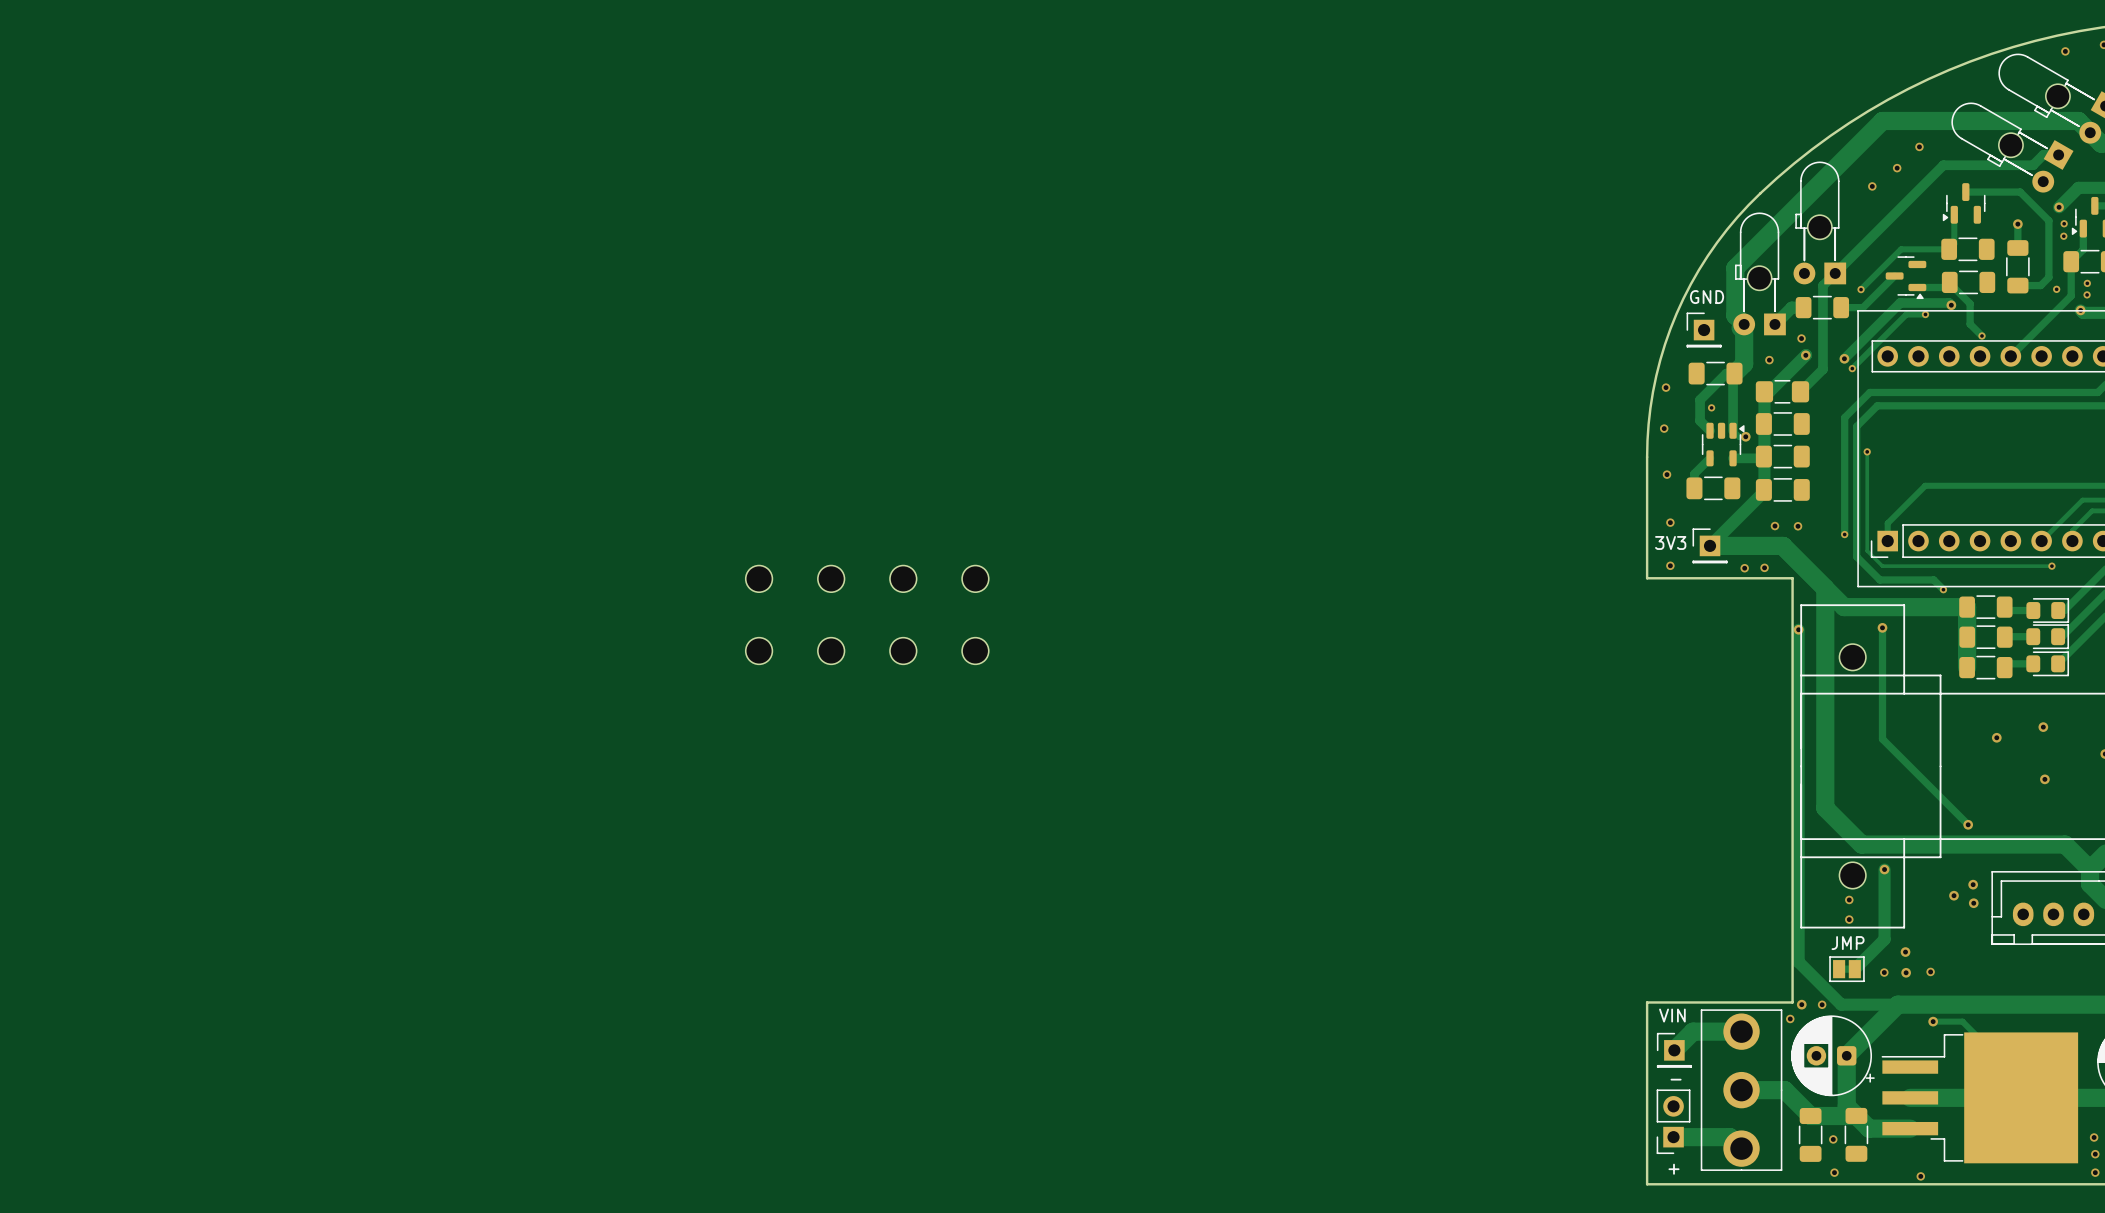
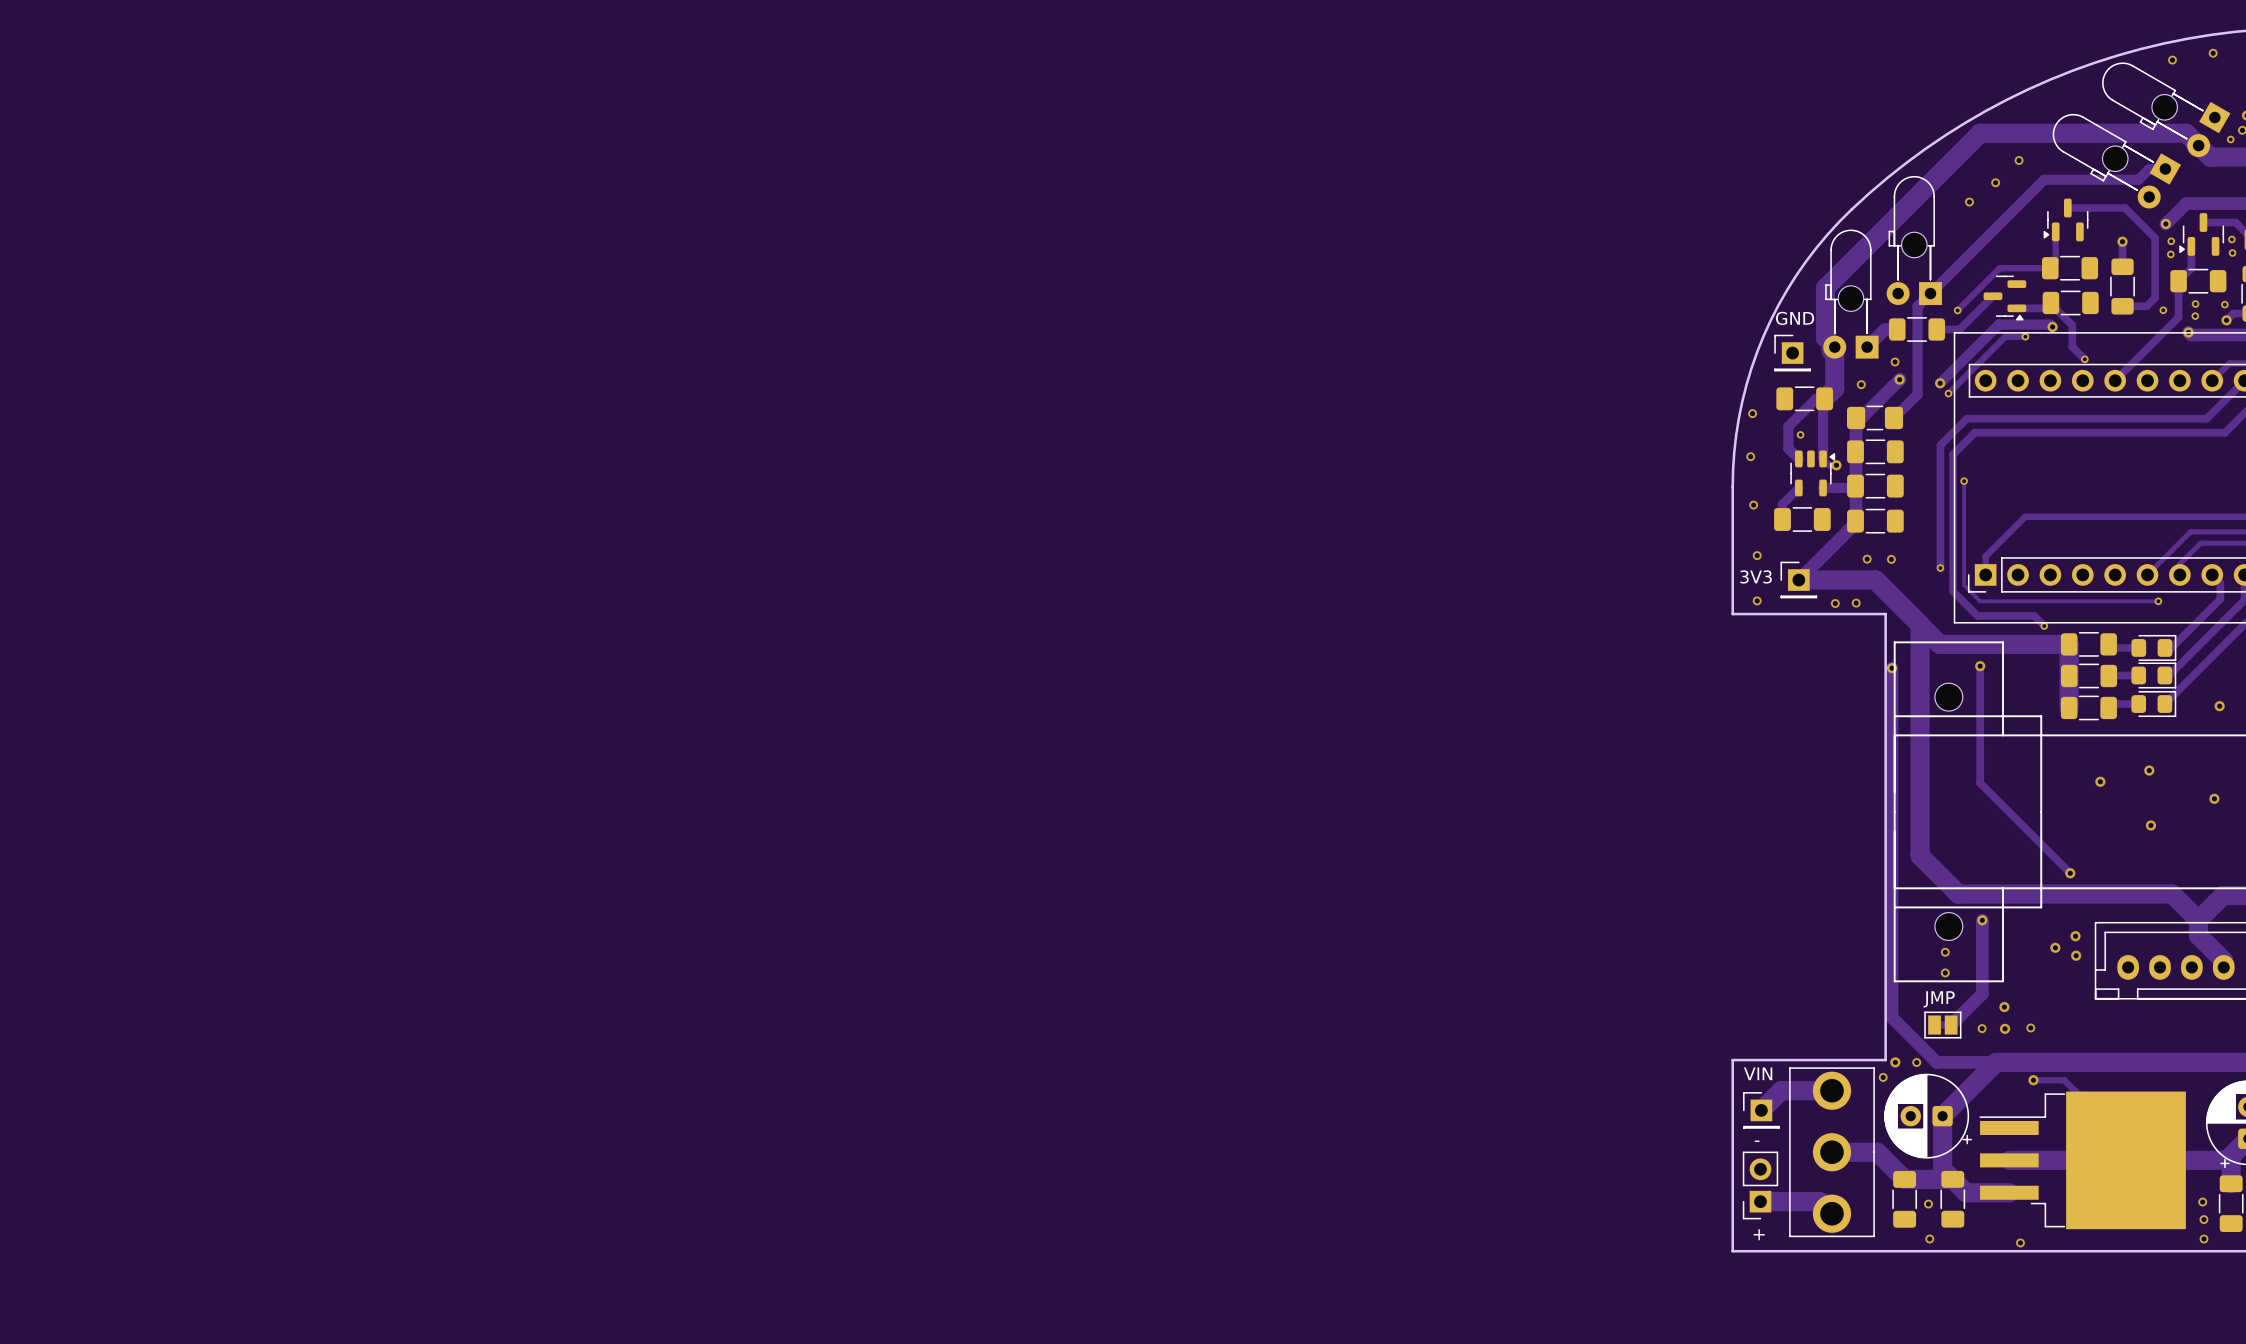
part: (759, 578) -> none
part: (831, 578) -> none
part: (903, 578) -> none
part: (975, 578) -> none
part: (759, 650) -> none
part: (831, 650) -> none
part: (903, 650) -> none
part: (975, 650) -> none

